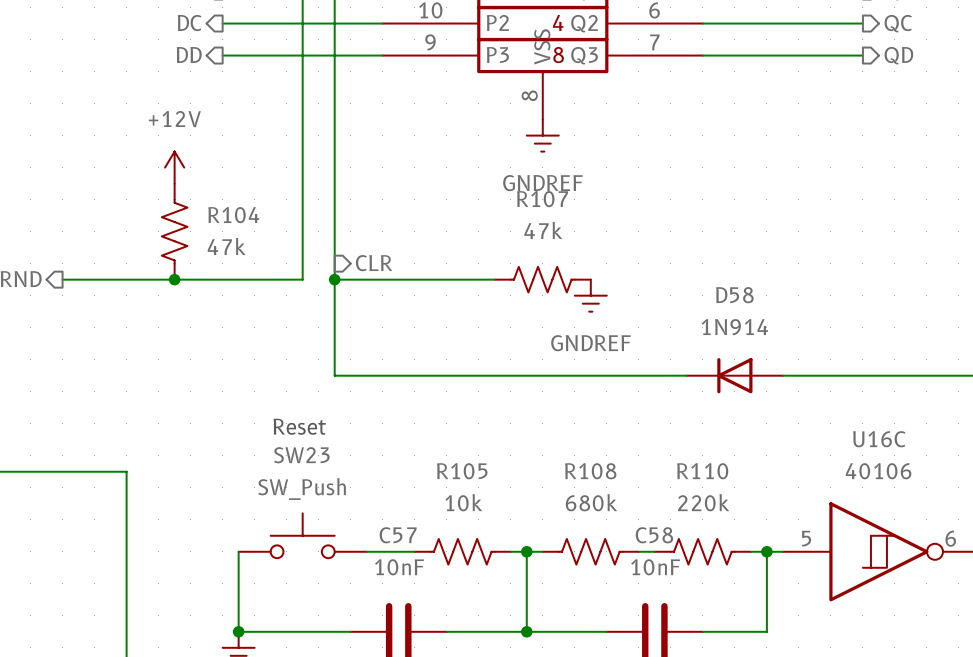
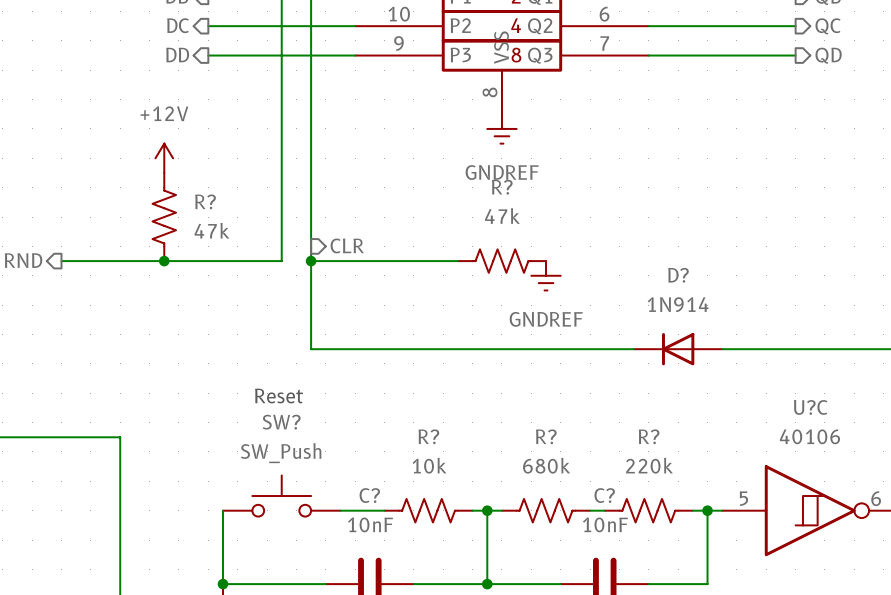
R107 name: R107 (542, 199) -> R? (502, 187)
R104 name: R104 (233, 215) -> R? (205, 201)
D58 name: D58 (734, 295) -> D? (678, 275)
U16C name: U16C (879, 439) -> U?C (810, 407)
SW23 name: SW23 (301, 455) -> SW? (281, 422)
R105 name: R105 (462, 471) -> R? (428, 436)
R108 name: R108 (590, 471) -> R? (546, 436)
R110 name: R110 (702, 471) -> R? (649, 436)
C57 name: C57 (398, 535) -> C? (369, 495)
C58 name: C58 (654, 535) -> C? (604, 495)

